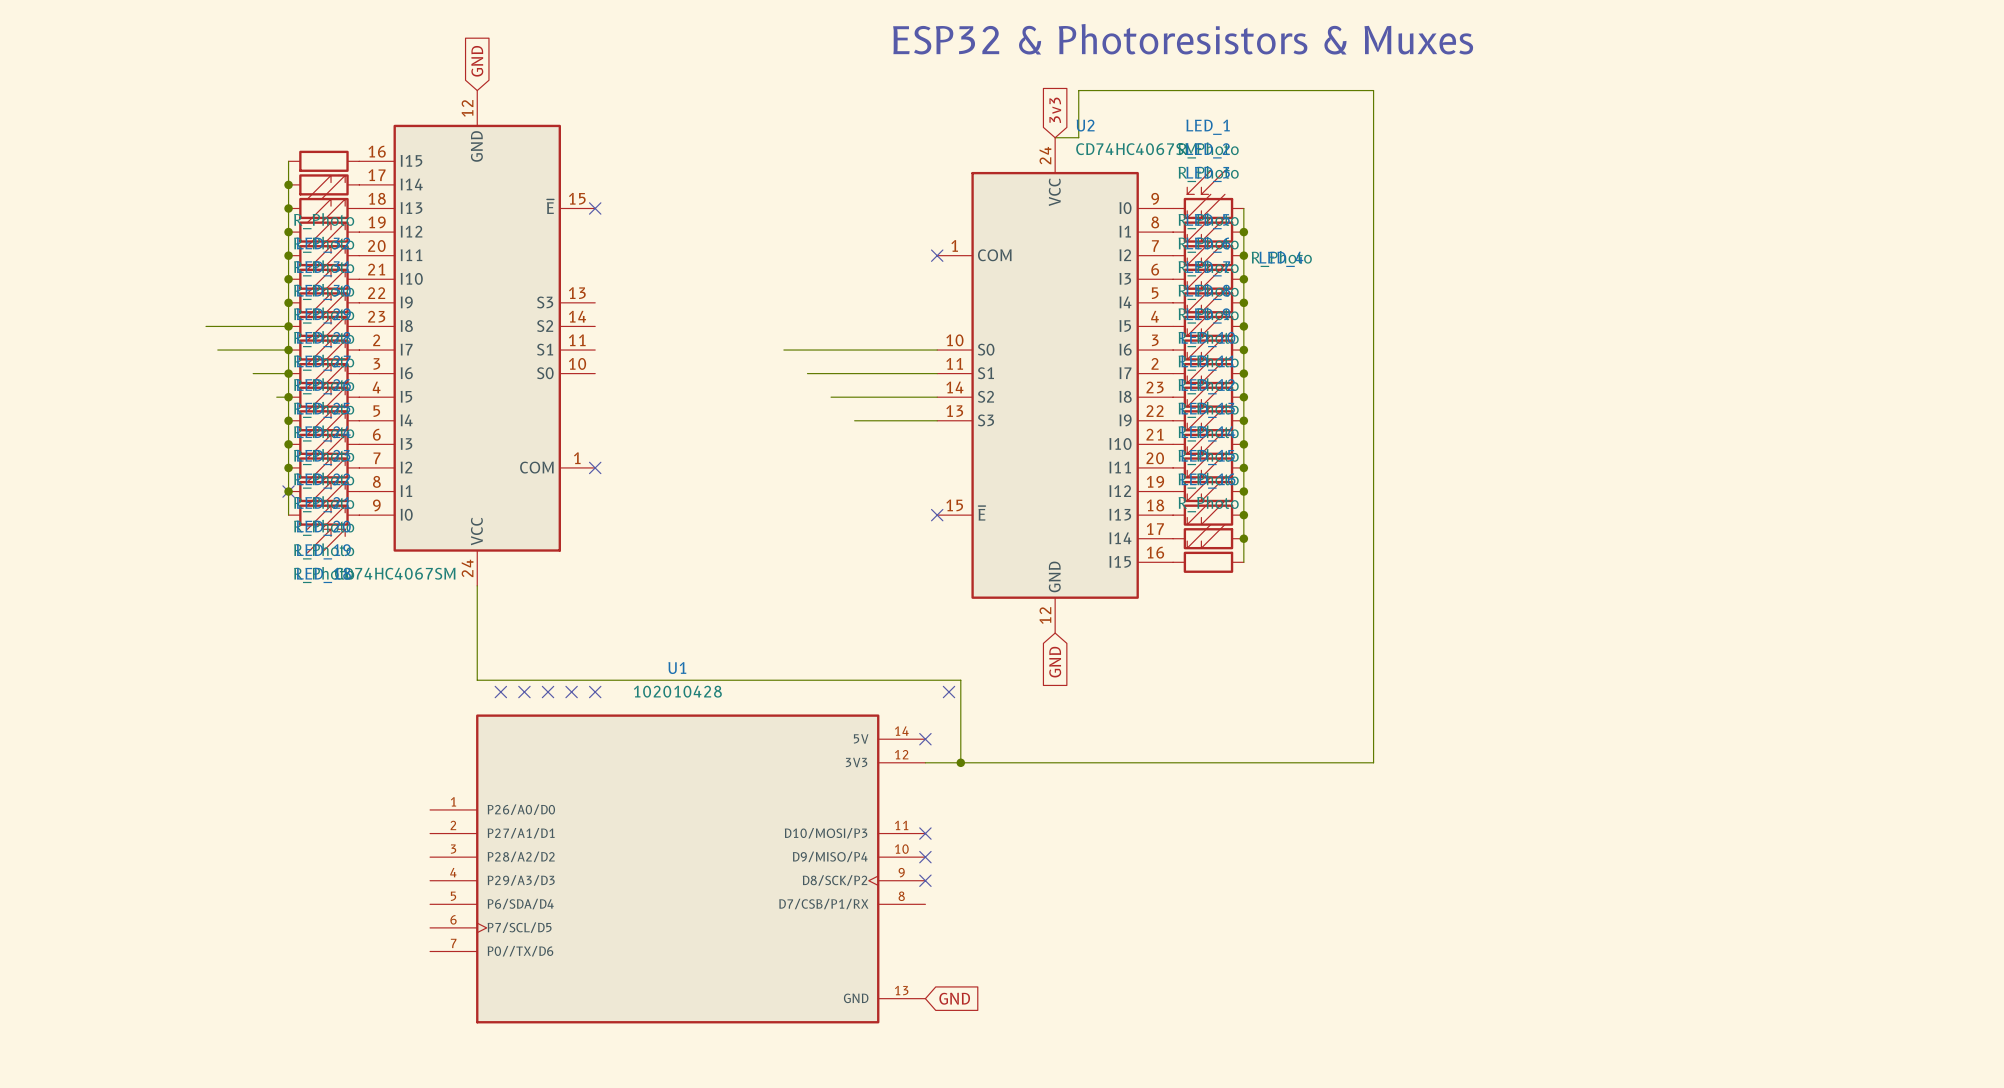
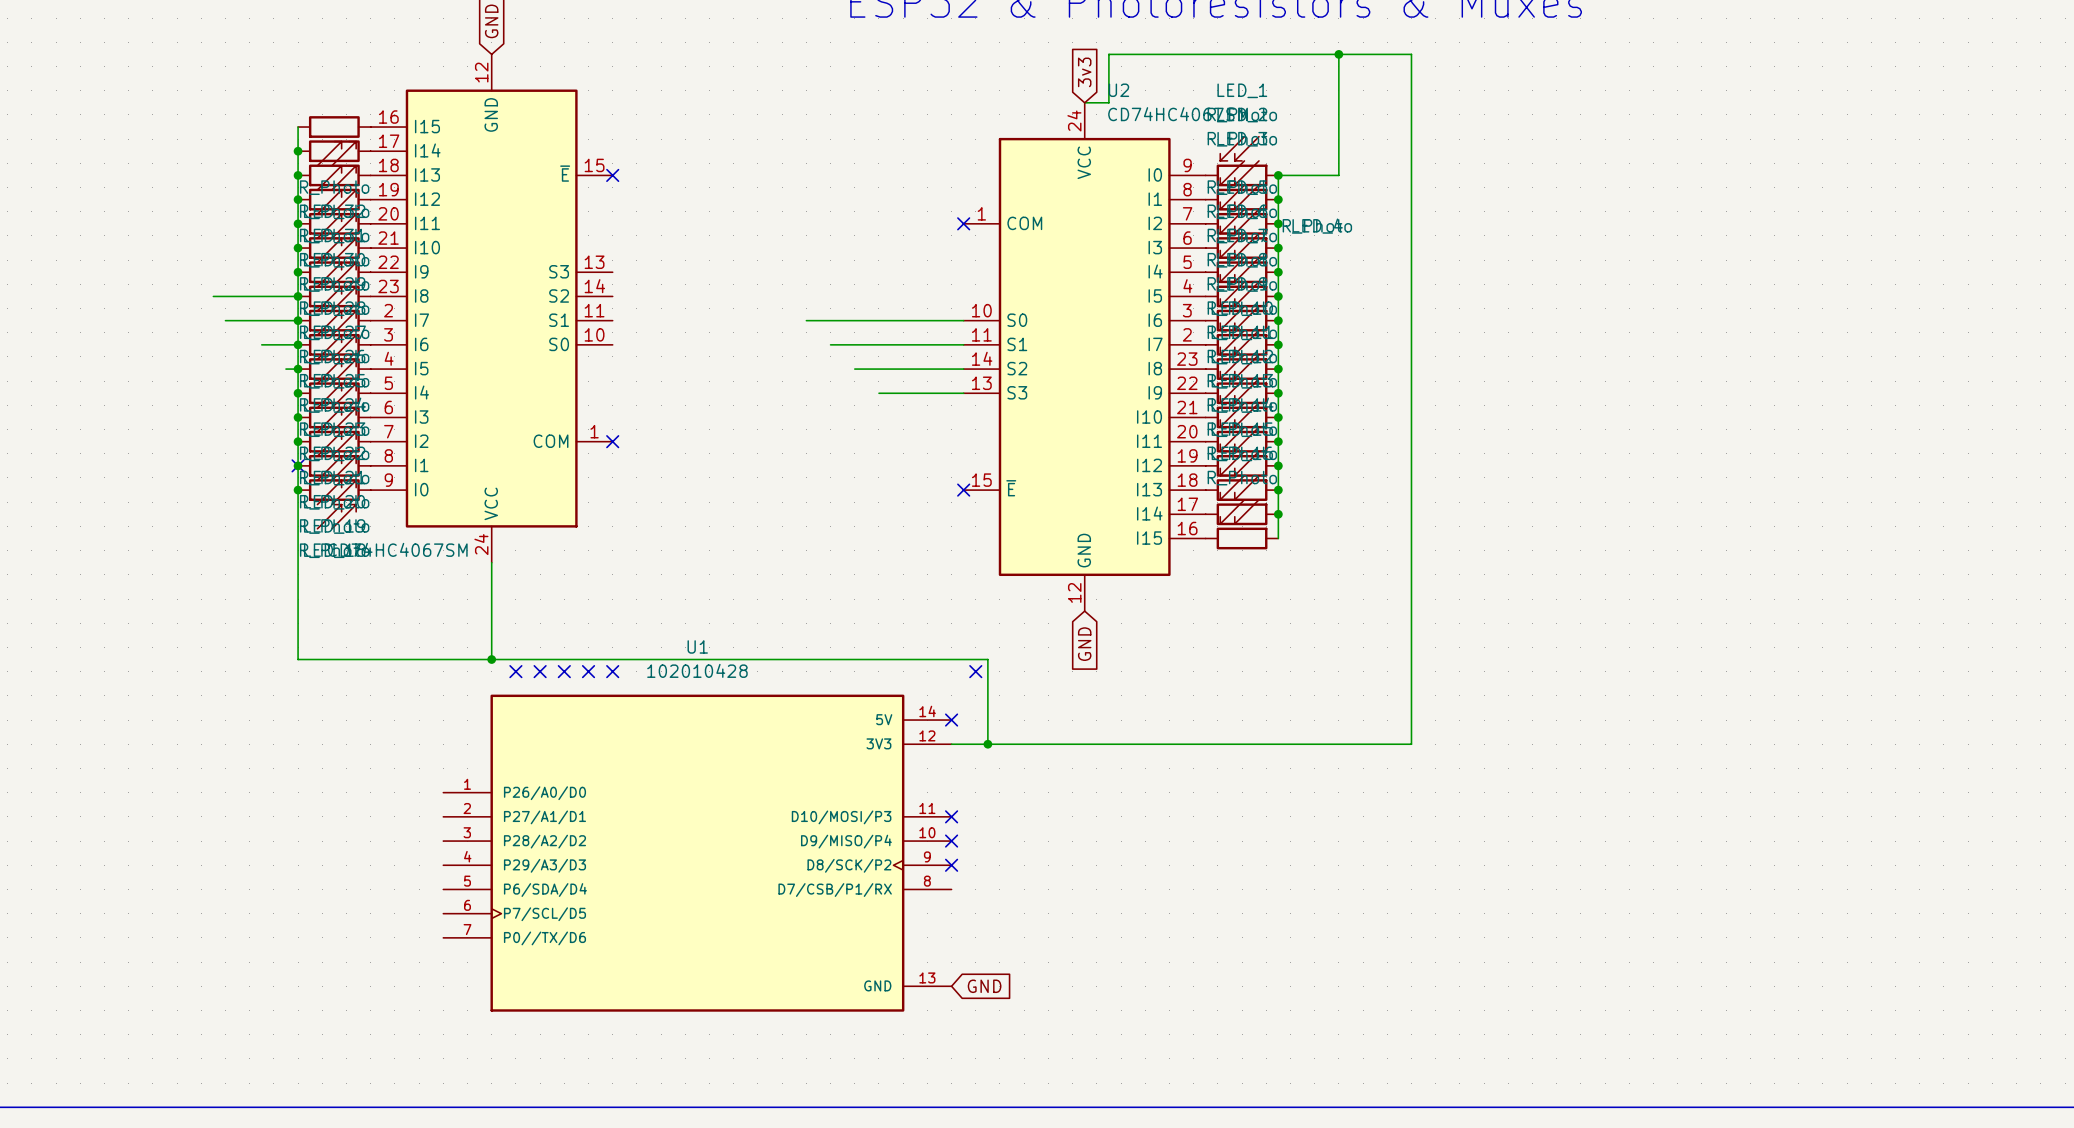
wire: none -> (1338, 54) (1338, 175) (1278, 175)
junction: none -> (1338, 54)
junction: none -> (1278, 175)
wire: none -> (298, 490) (298, 659) (491, 659)
junction: none -> (298, 490)
junction: none -> (491, 659)

